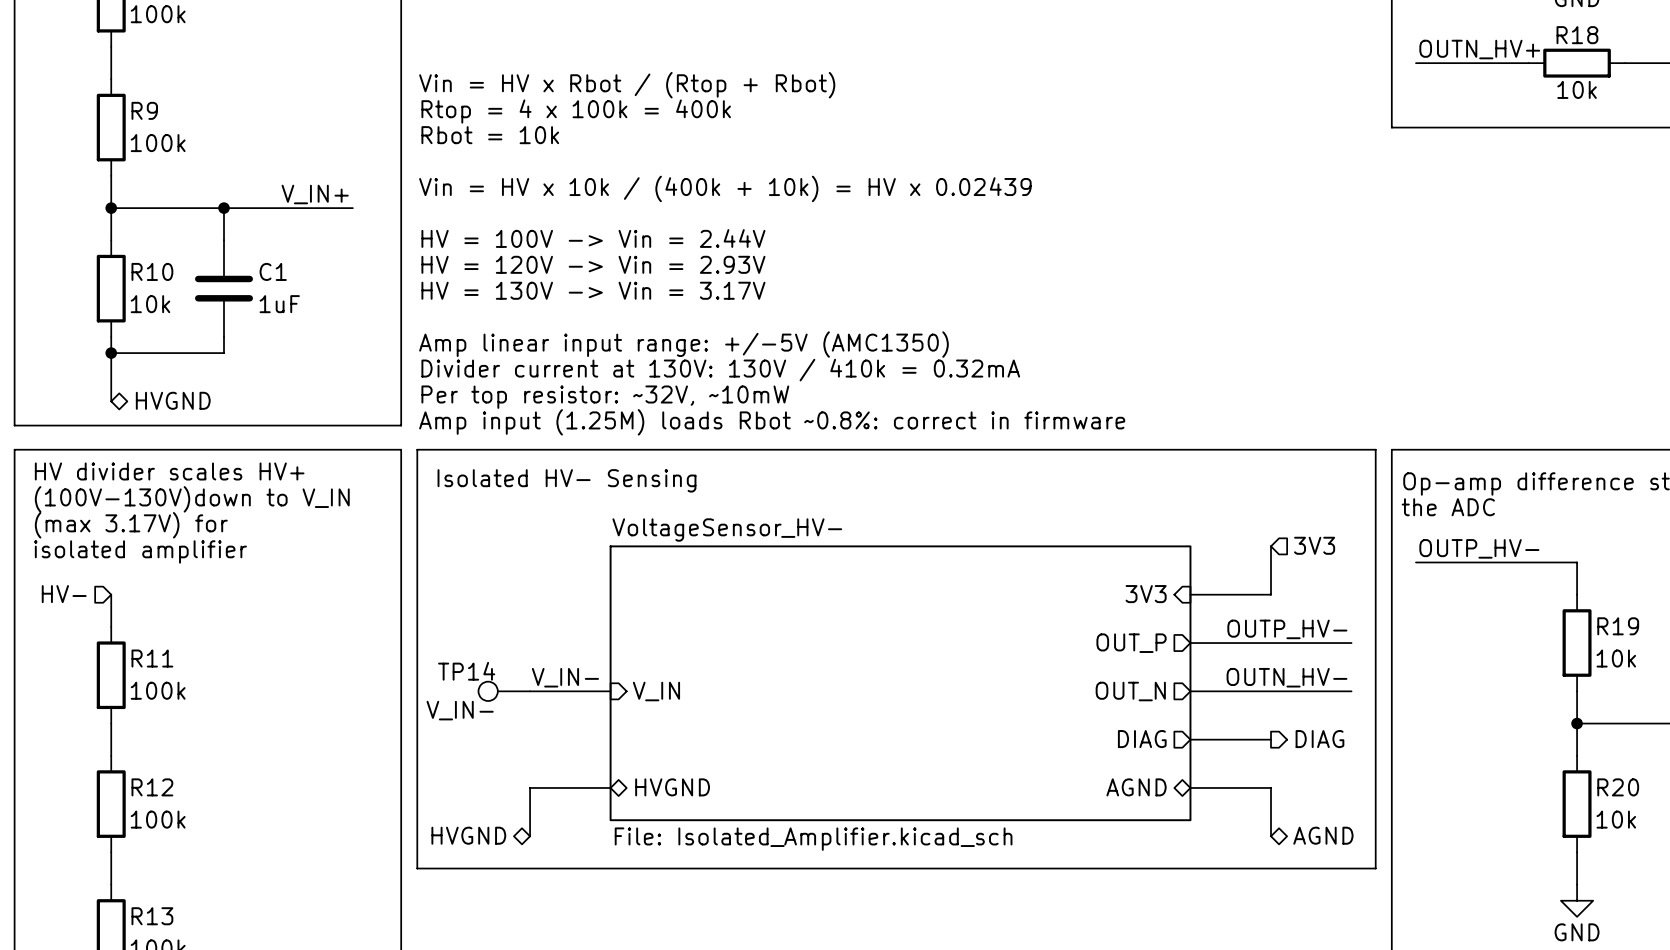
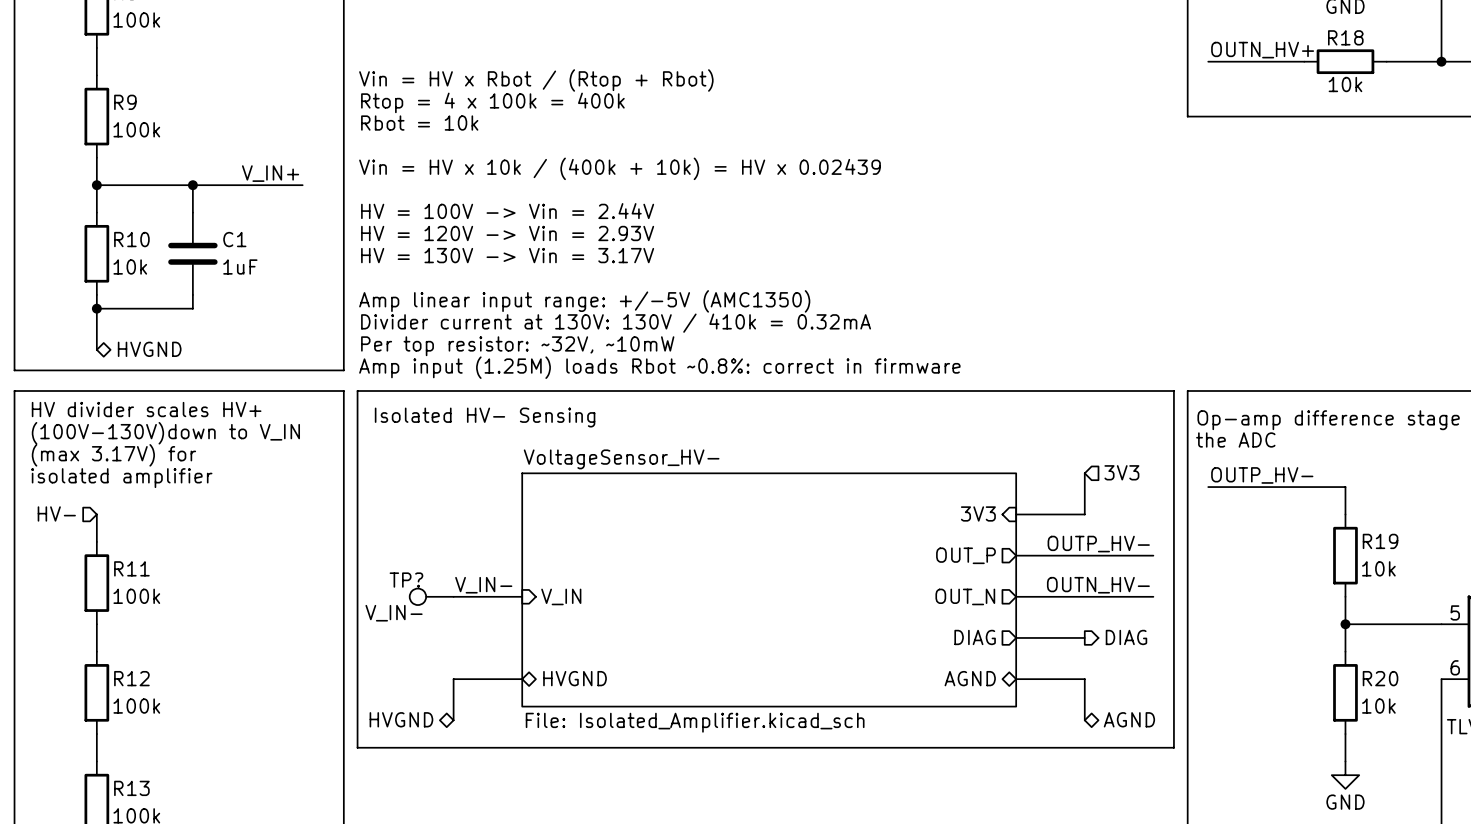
TP14 name: TP14 (466, 671) -> TP? (406, 580)

